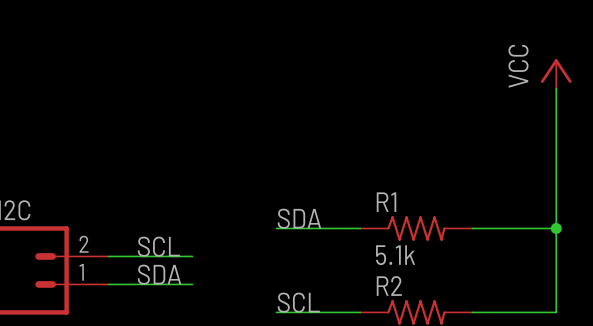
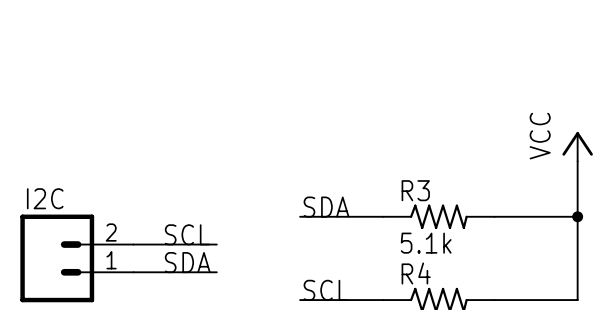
power symbol position: VCC (556, 73) -> VCC (577, 146)
wire: (556, 88) (556, 172) -> none
R1 name: R1 (386, 202) -> R3 (415, 190)
R2 name: R2 (389, 286) -> R4 (416, 273)

